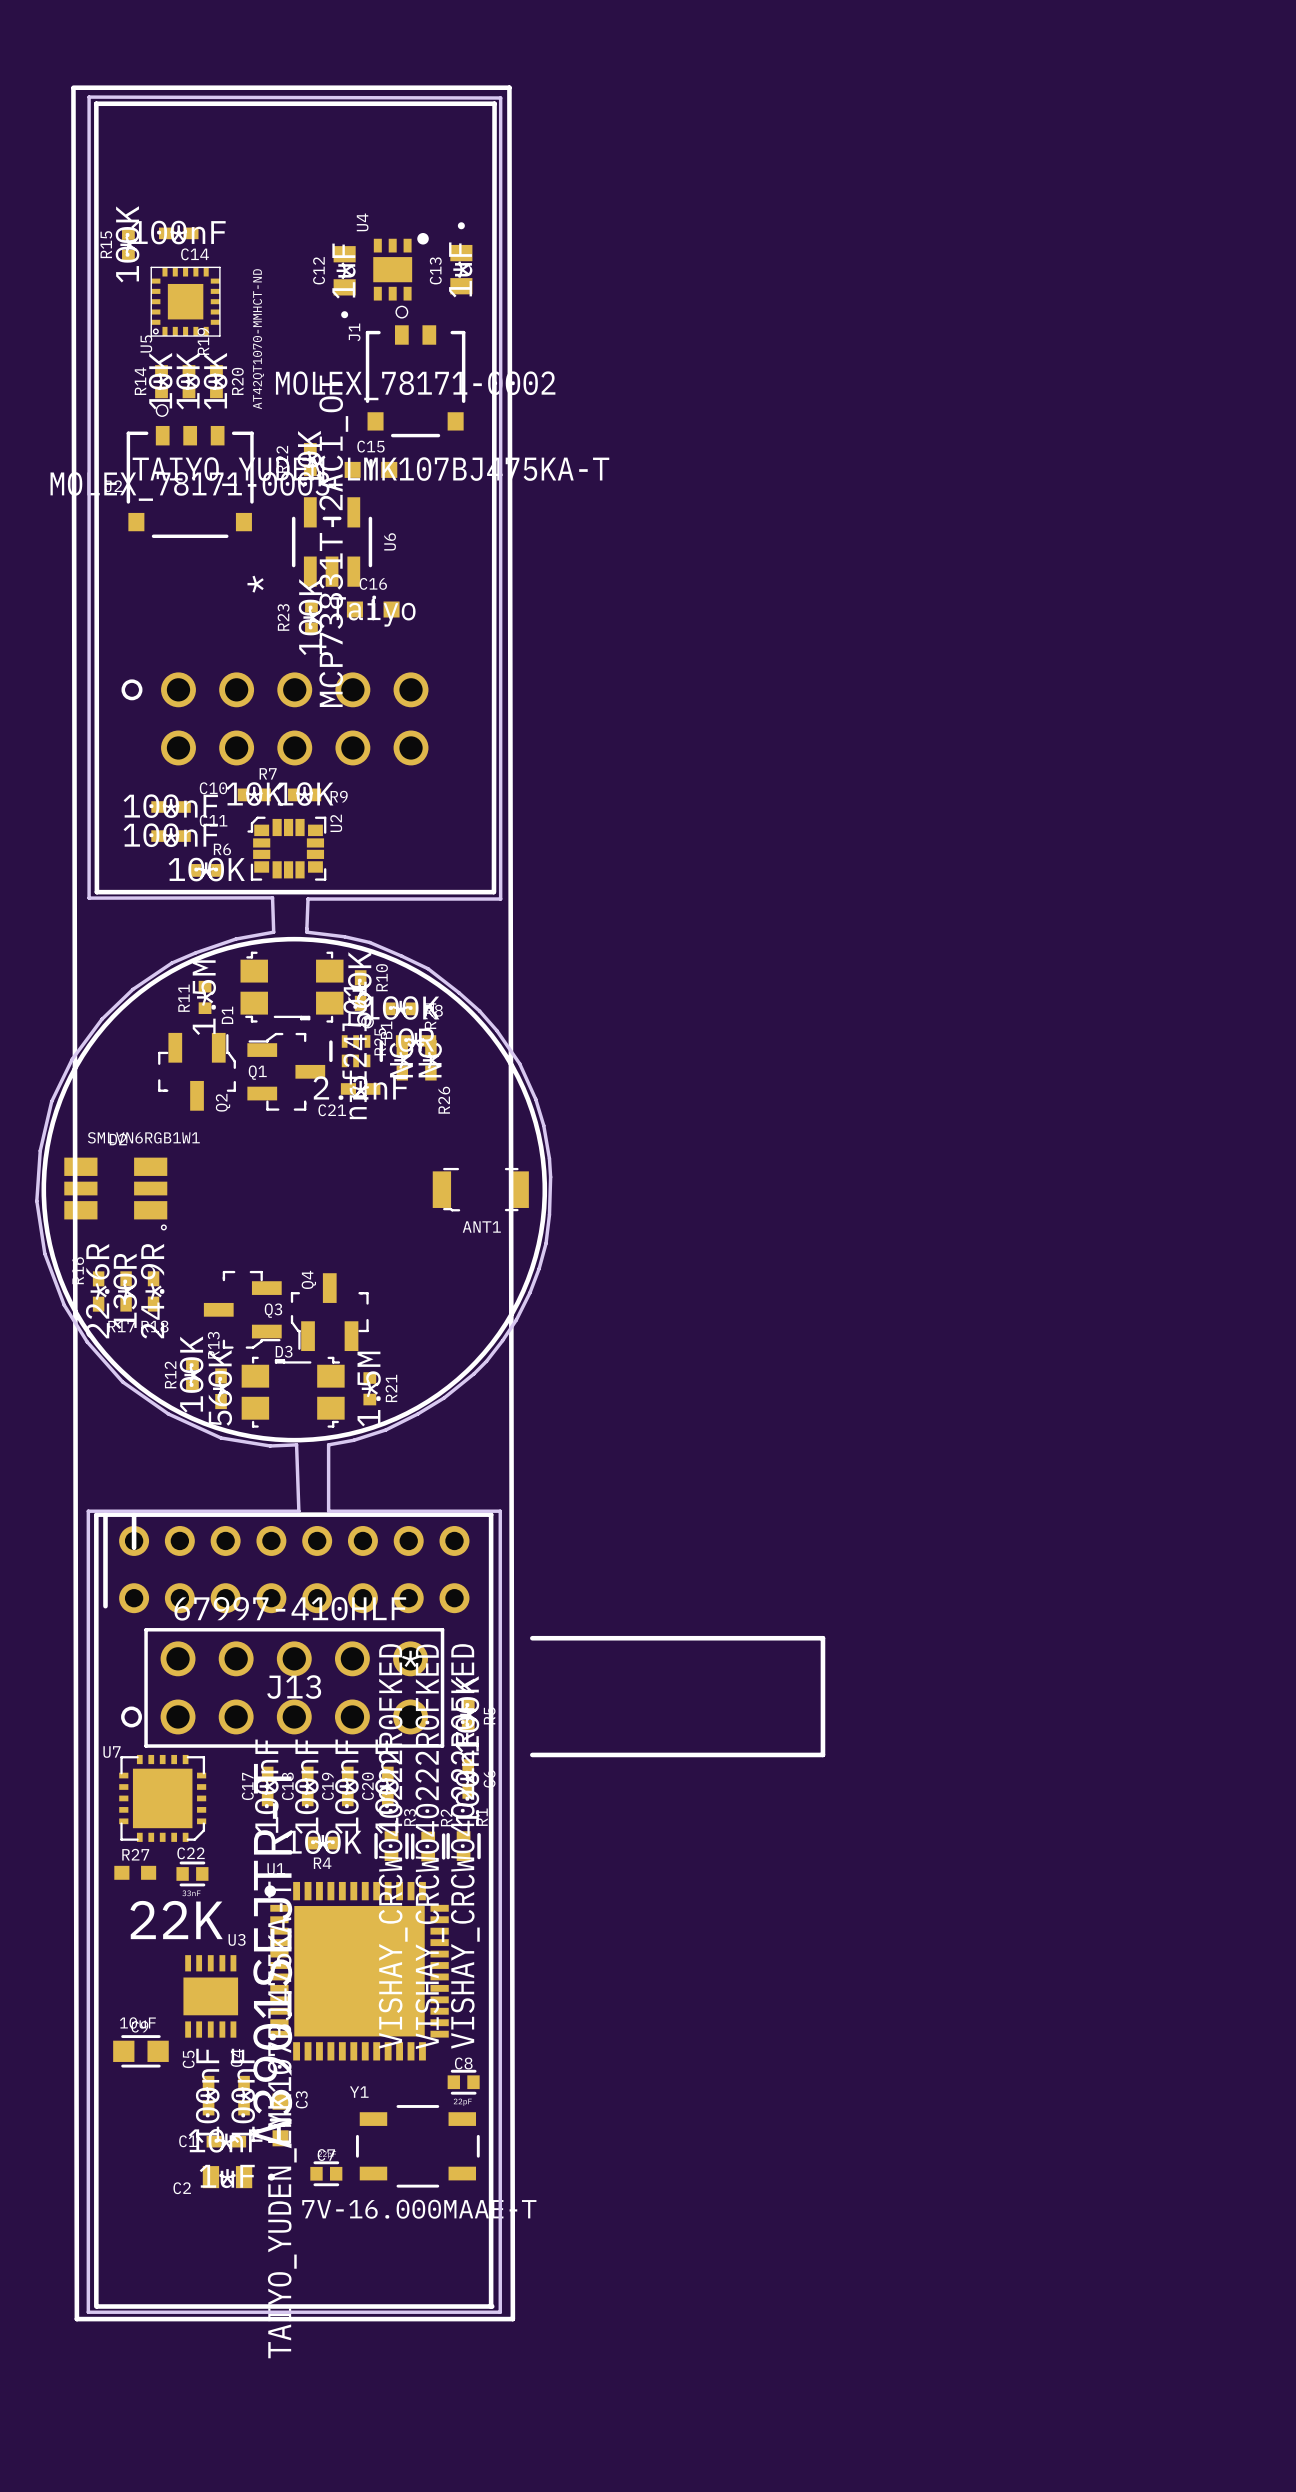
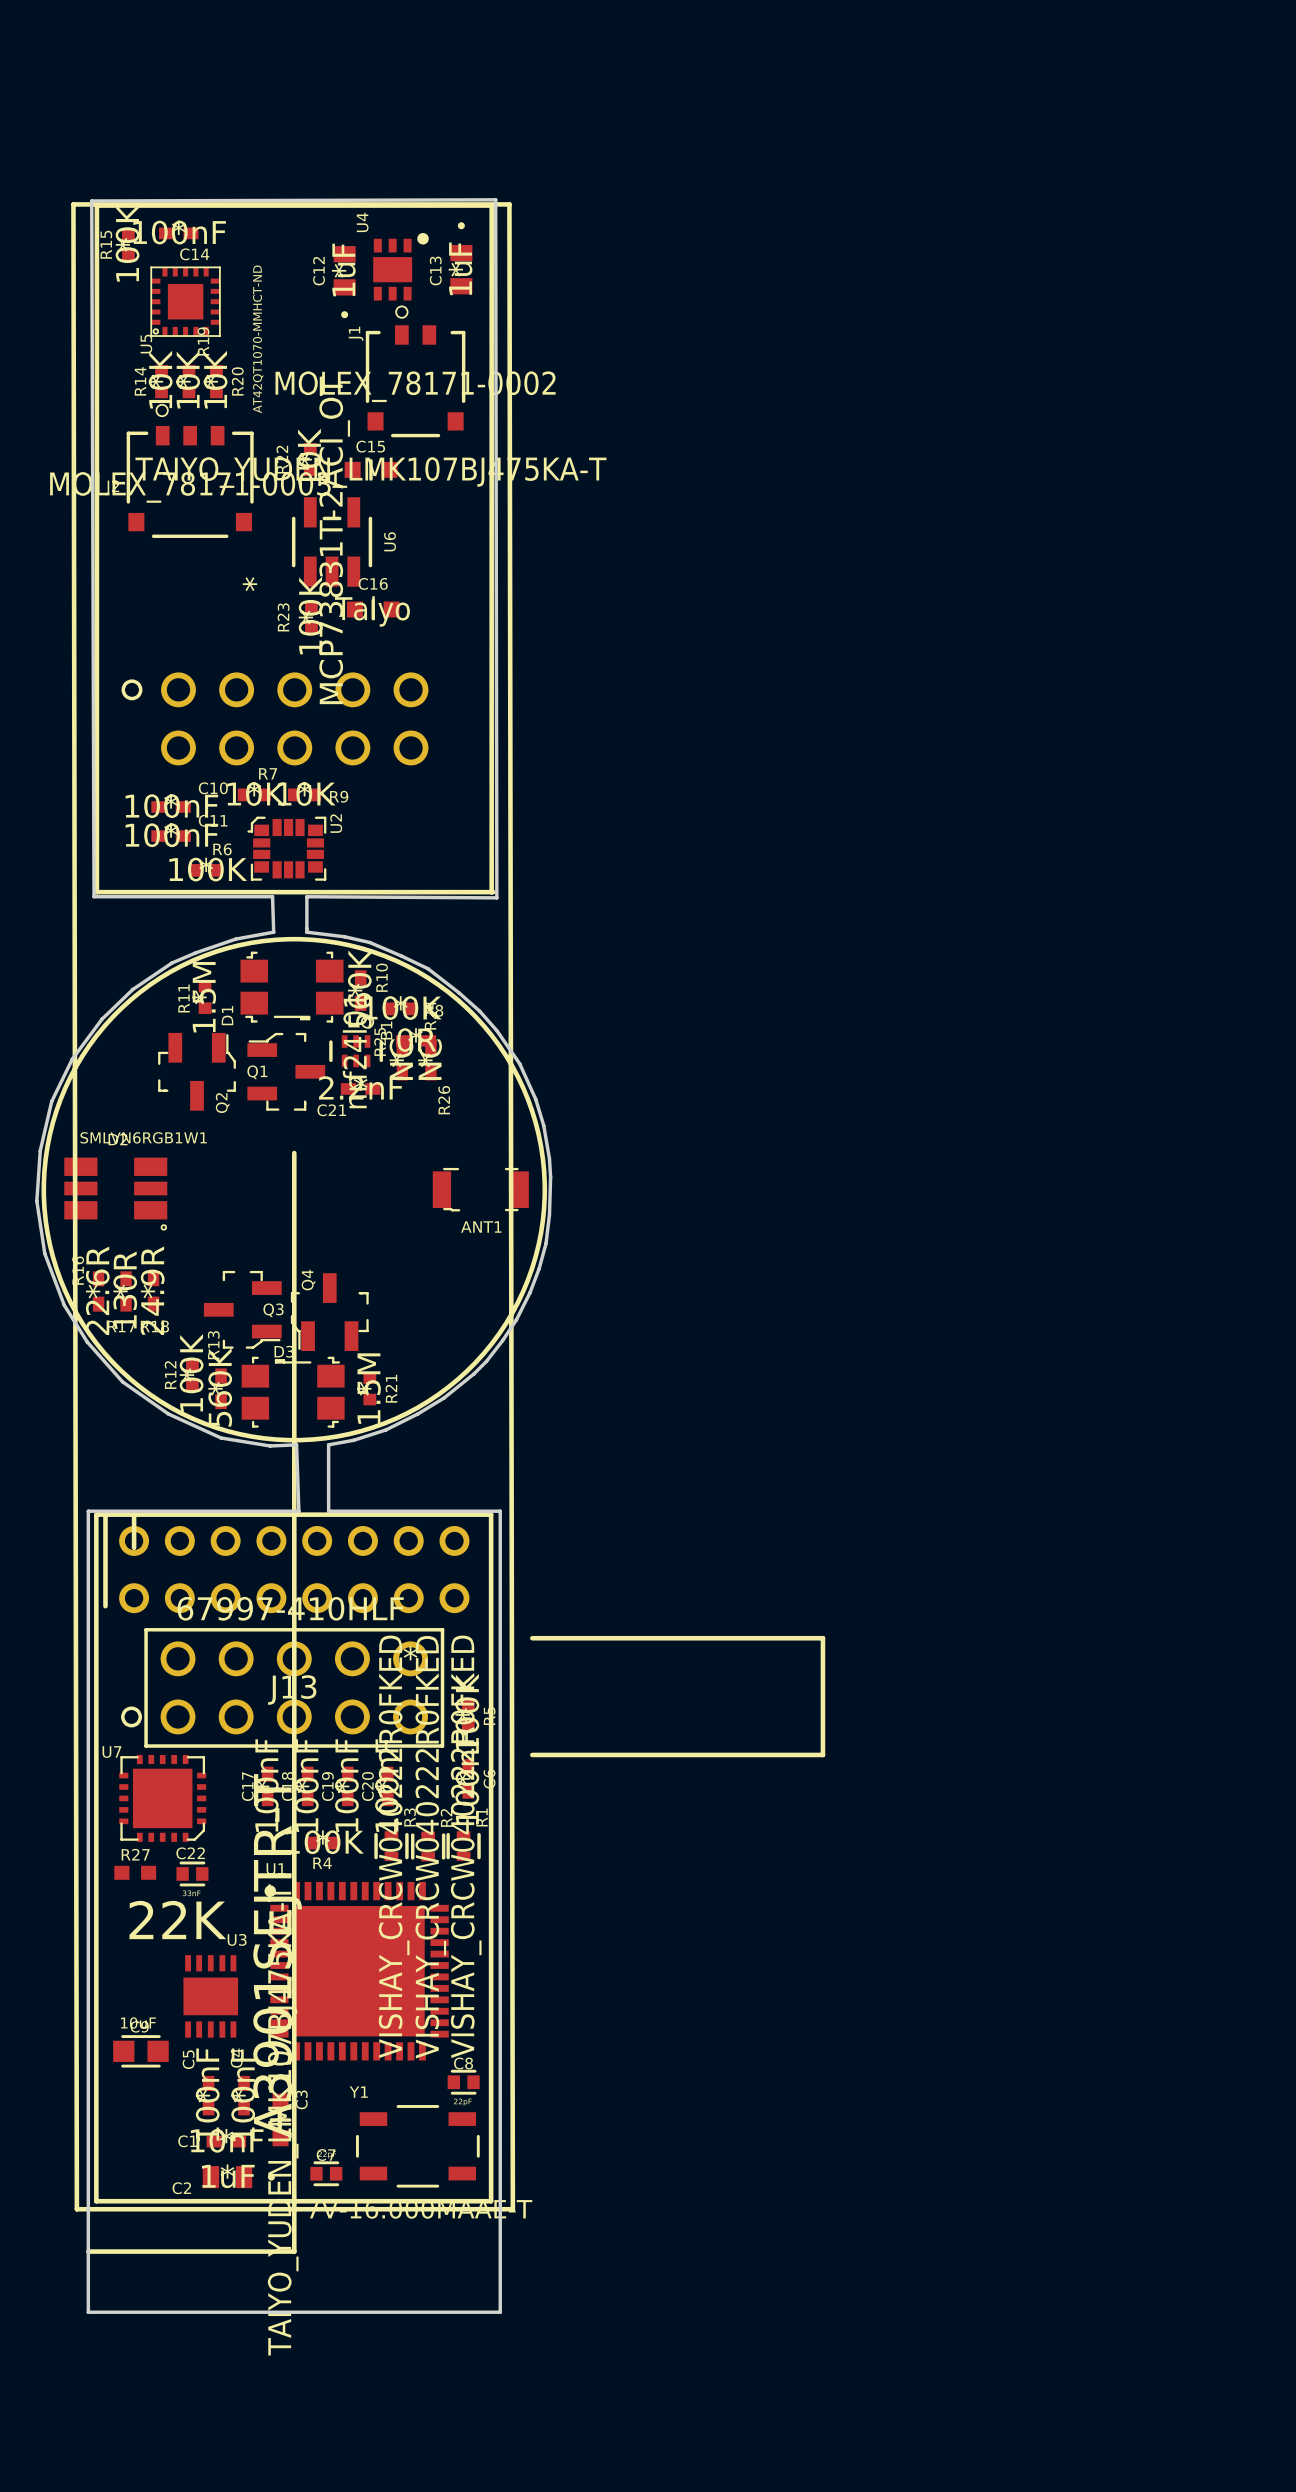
line: (73, 87) (509, 87) (512, 2319) (76, 2319) (73, 88) -> none
line: none -> (73, 204) (76, 2209) (512, 2209) (509, 204) (73, 204)
line: (96, 892) (96, 103) (494, 103) (493, 892) -> (96, 892) (96, 205) (491, 205) (491, 892)
board edge: (306, 928) (308, 899) (500, 899) (500, 98) (89, 97) (89, 898) (272, 897) (273, 932) -> (306, 928) (306, 896) (496, 897) (495, 199) (91, 200) (94, 896) (272, 896) (273, 932)
line: none -> (294, 1153) (294, 2251) (88, 2251)
line: (96, 2201) (96, 2306) -> (96, 2201) (491, 2201)
line: (491, 2201) (491, 2306) -> none
line: (97, 2306) (492, 2306) -> none

